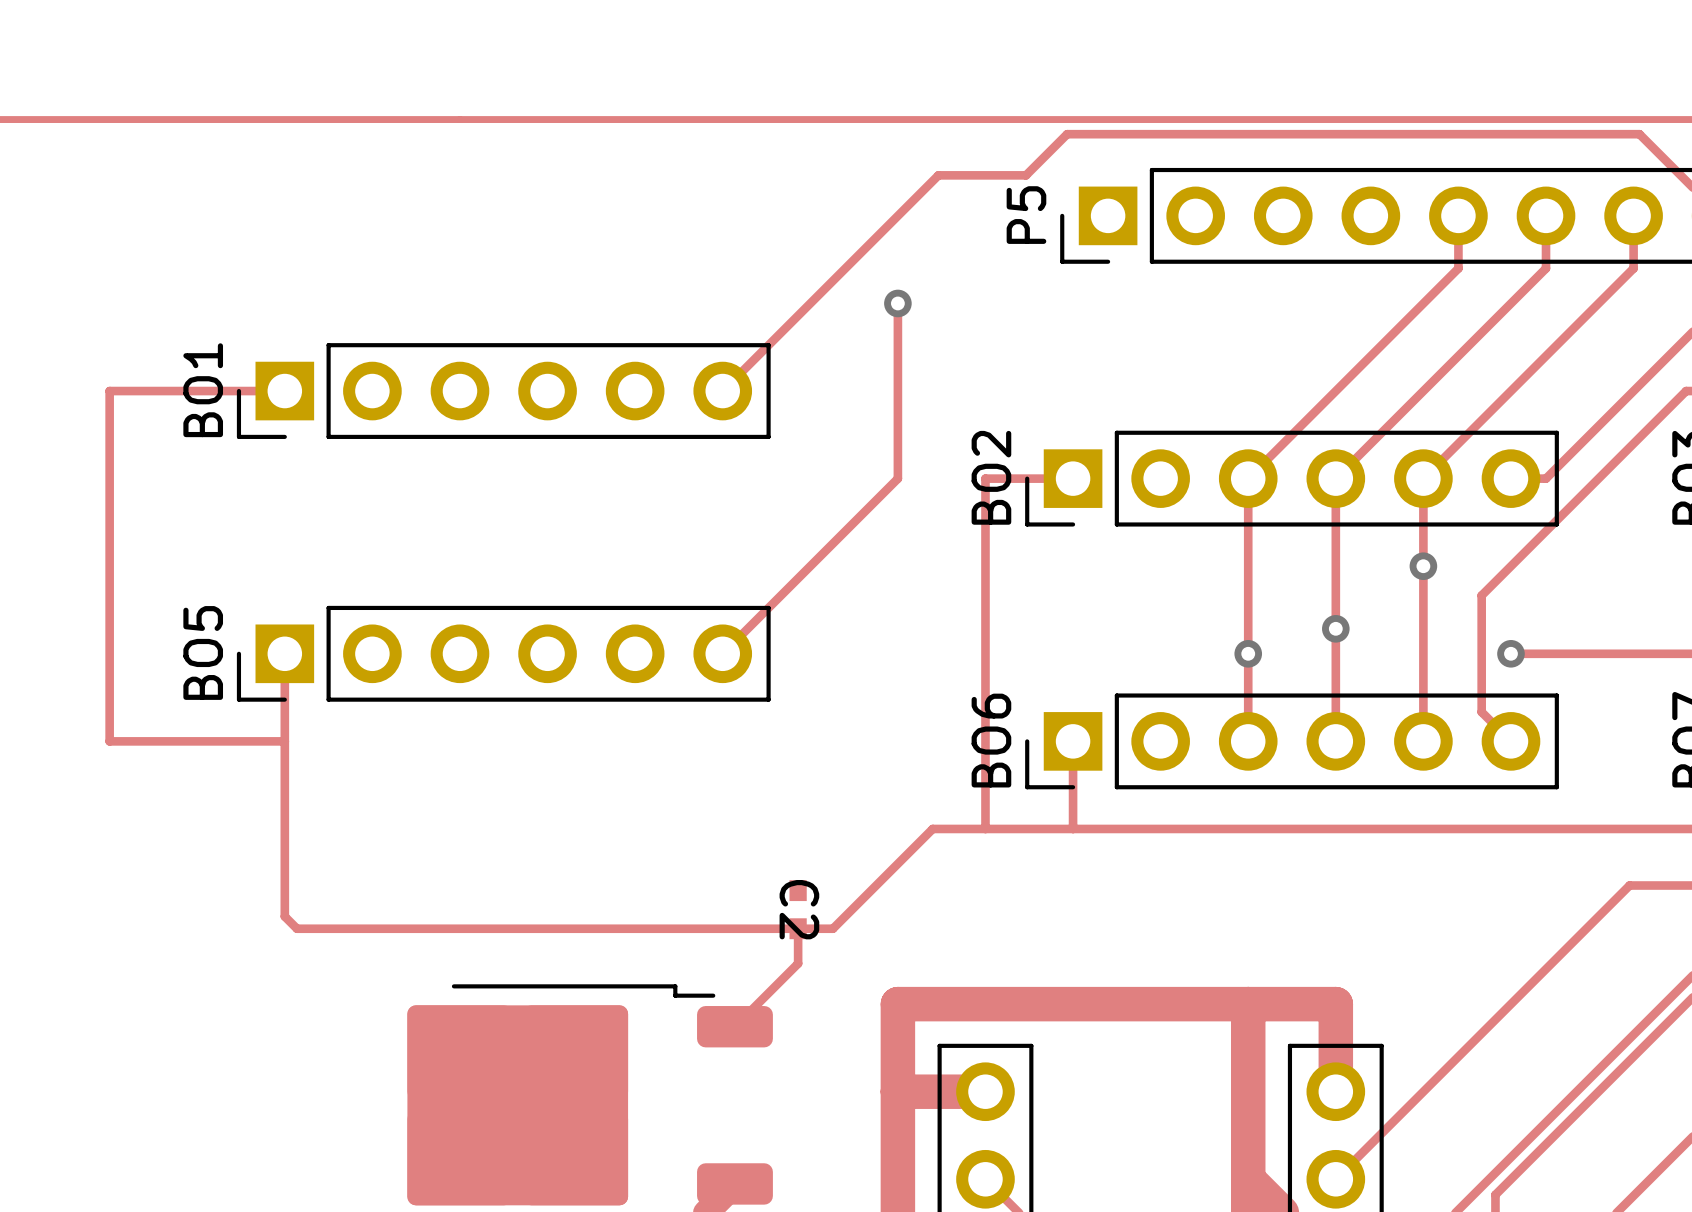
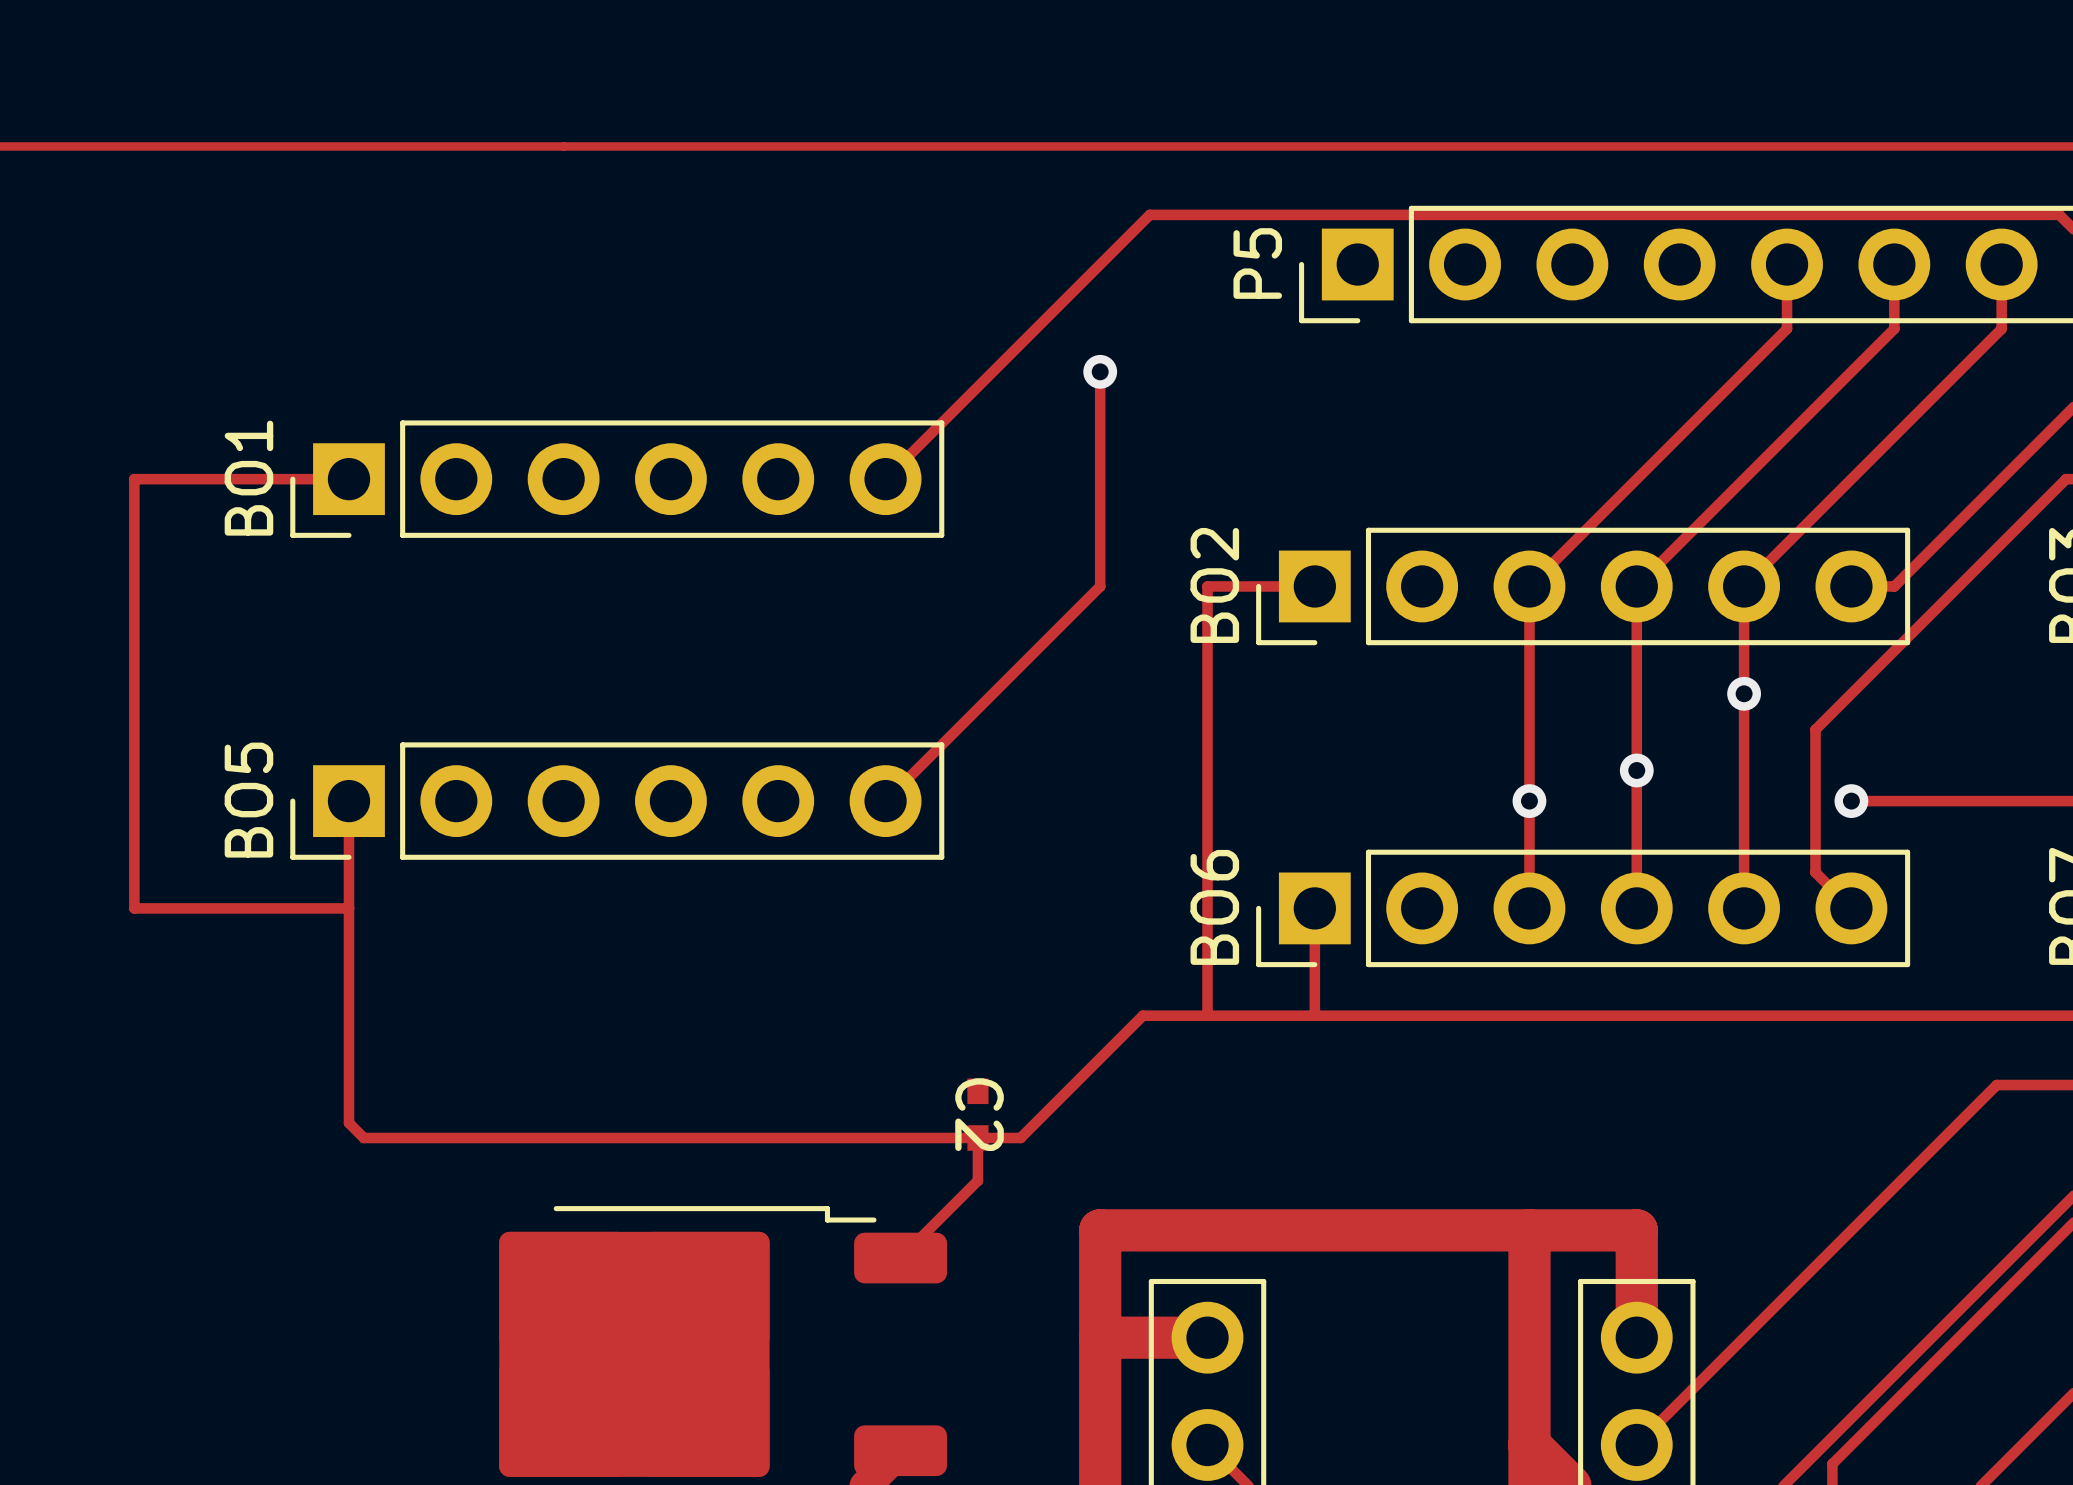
track: (1026, 175) (1067, 134) (1639, 134) (1680, 175) -> (1257, 214) (2059, 214)

